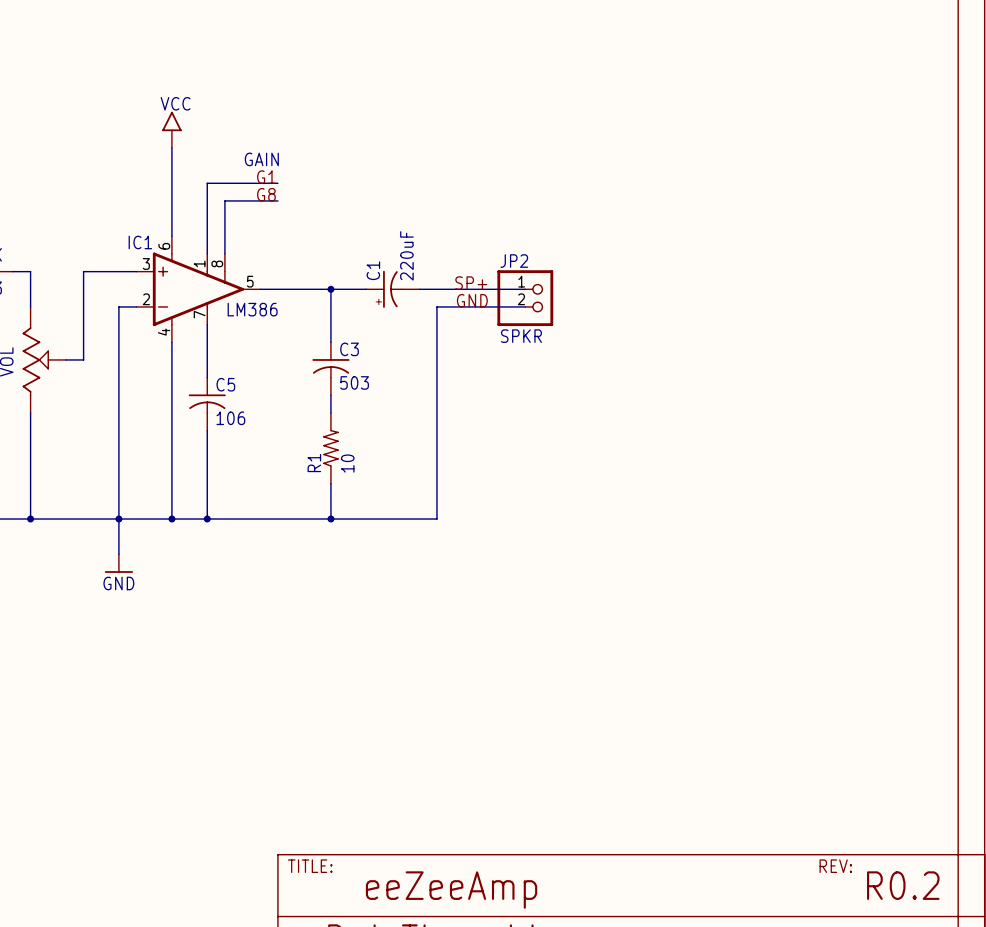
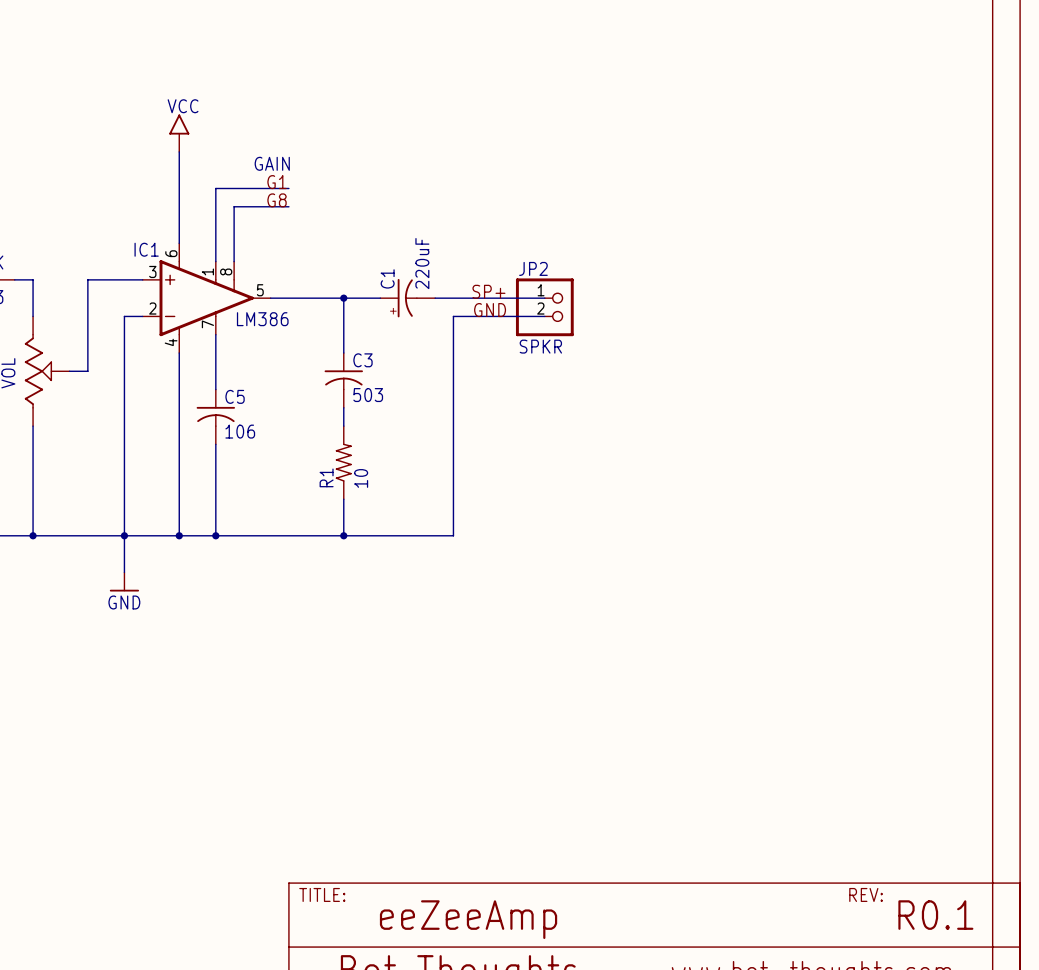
text: R0.2 (903, 885) -> R0.1 (935, 915)

